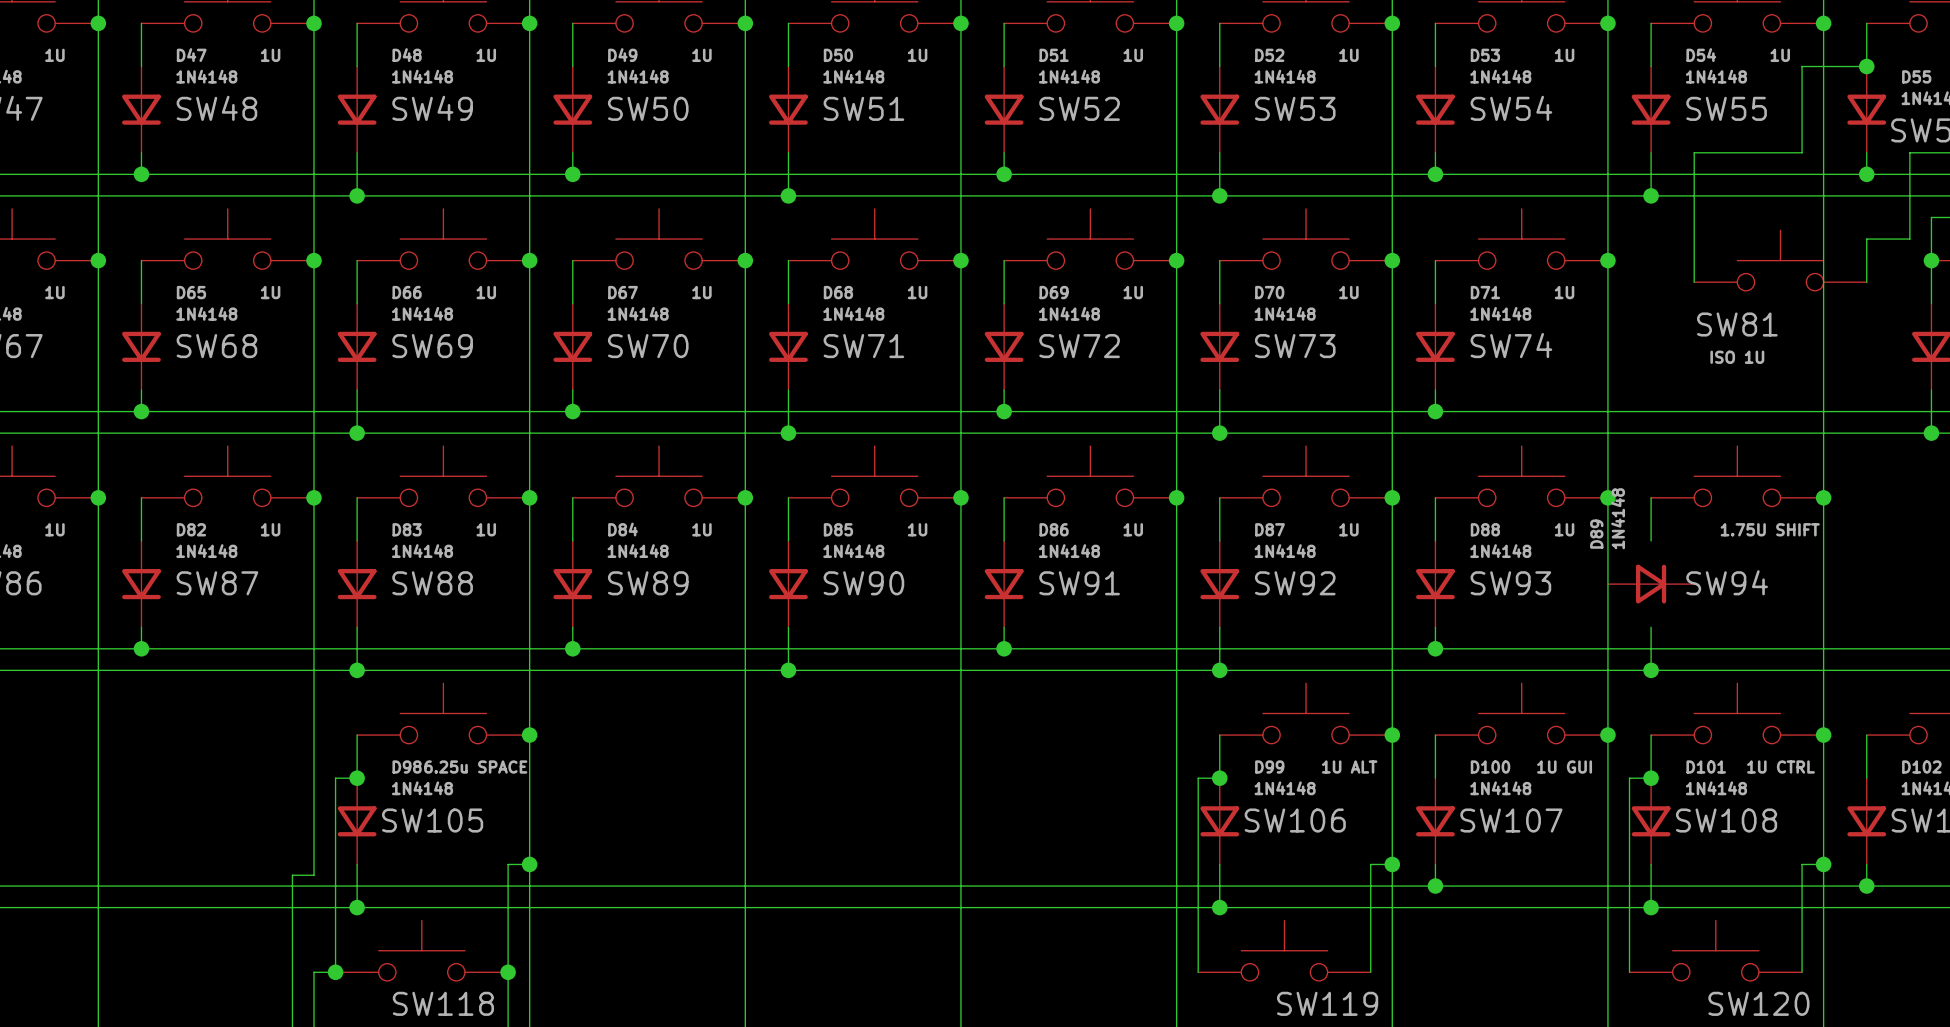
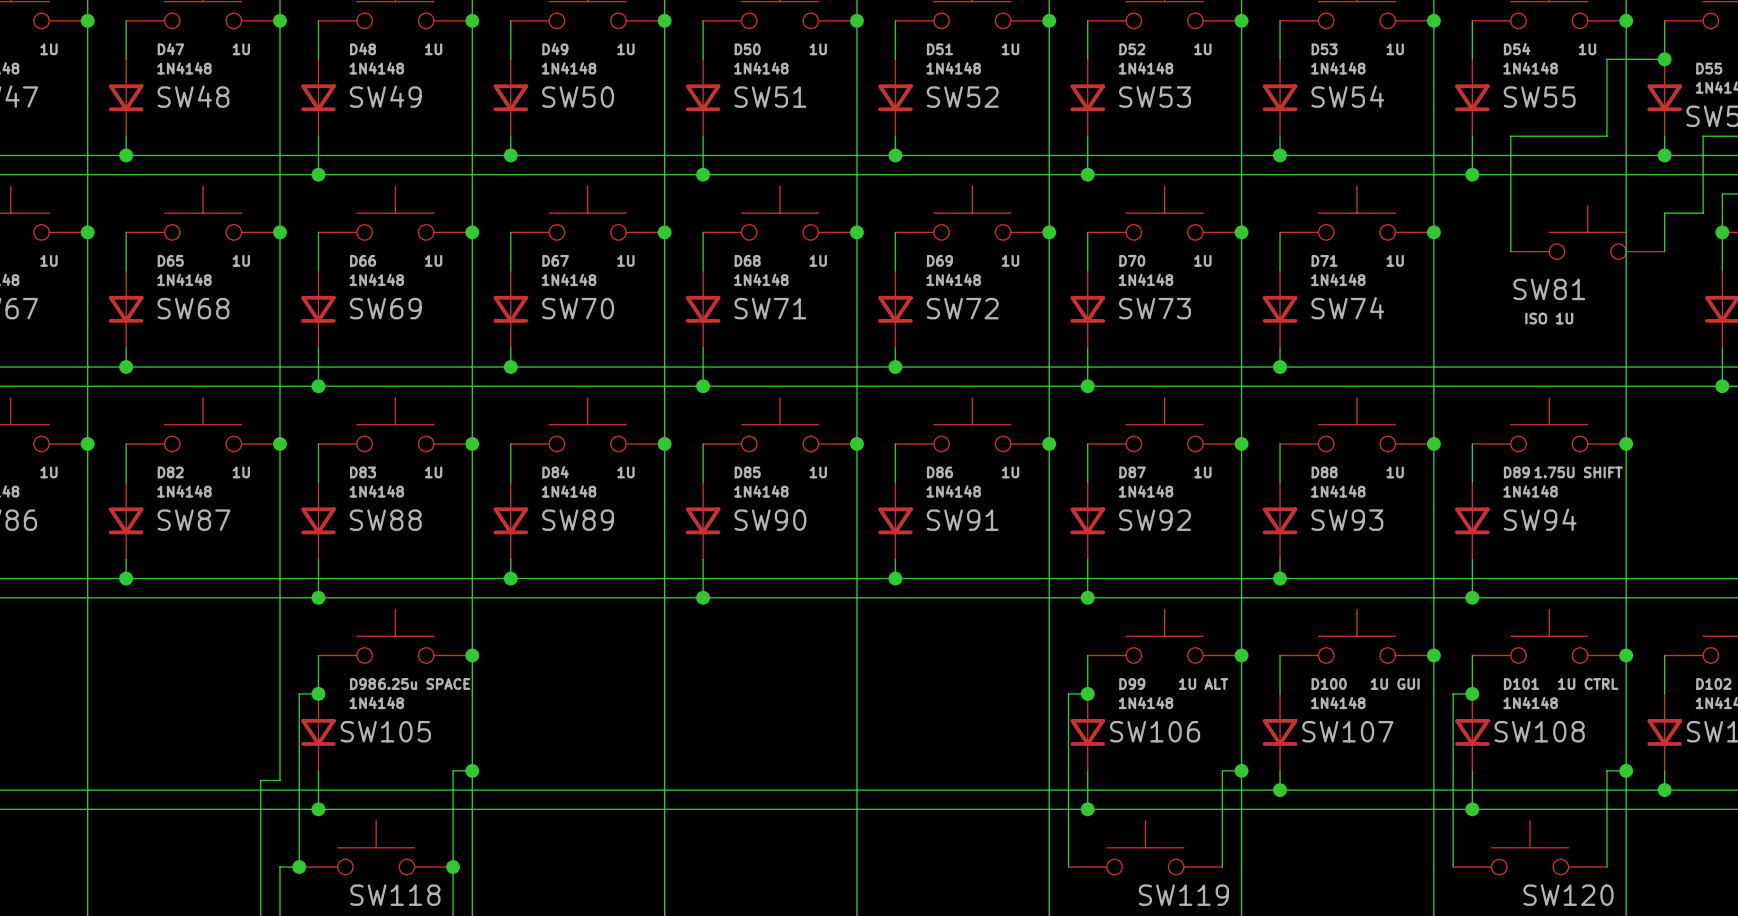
D89 rotation: 0° (1651, 584) -> 90° clockwise (1472, 520)

